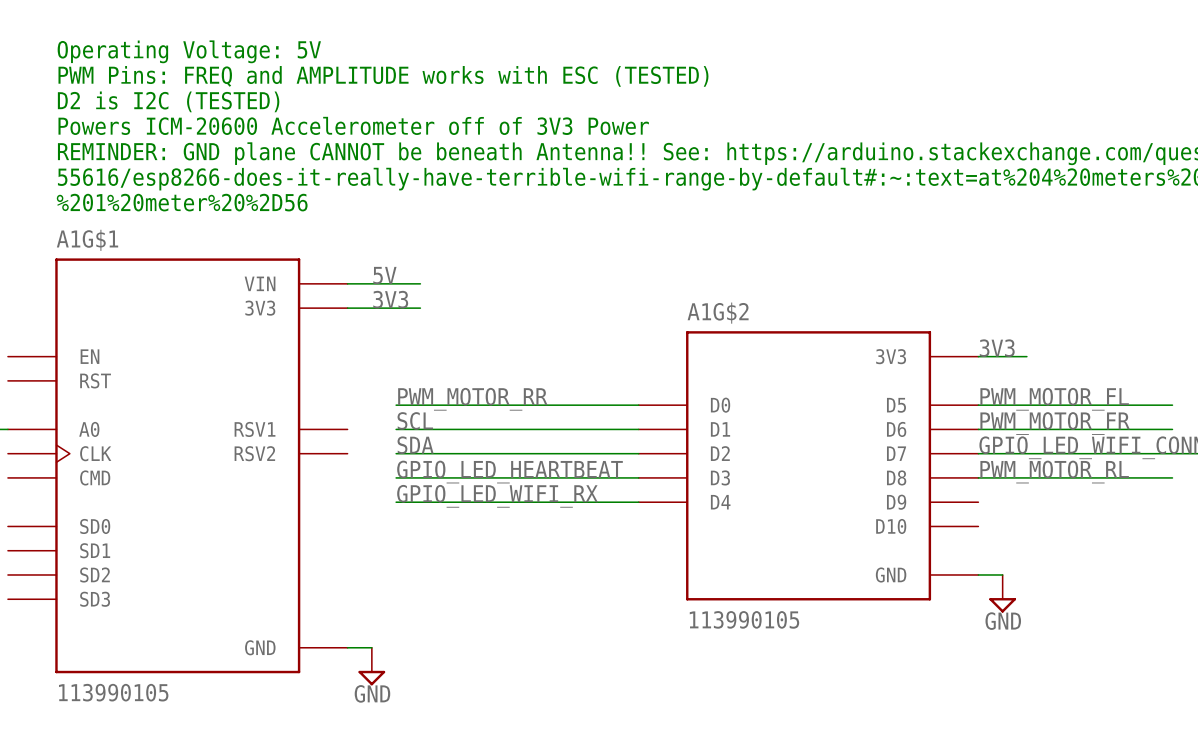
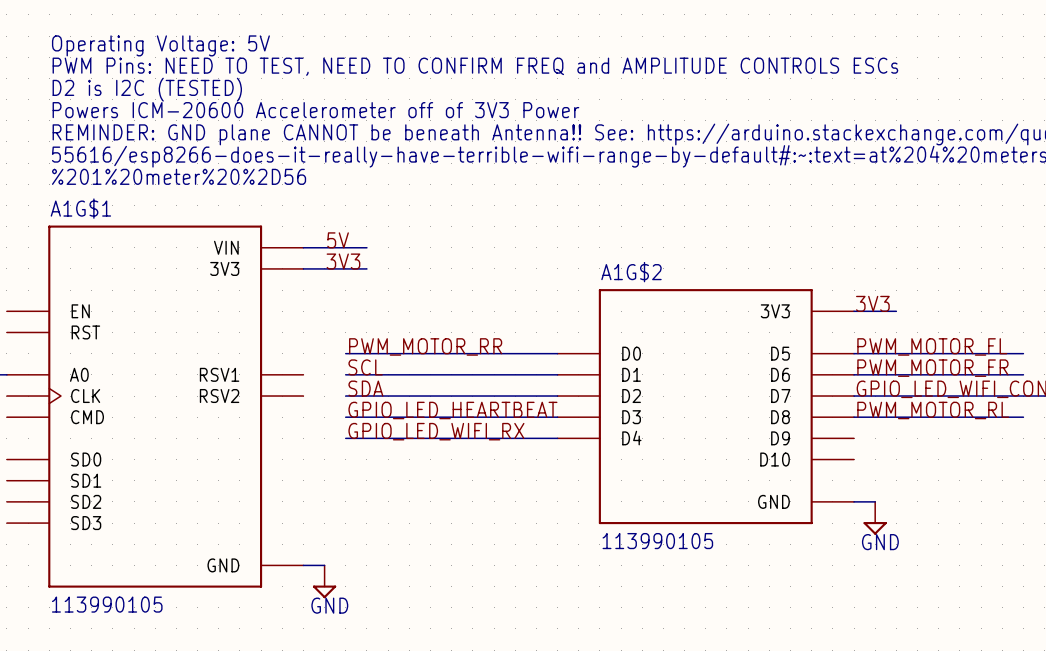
text: PWM Pins: FREQ and AMPLITUDE works with ESC (TESTED) (383, 76) -> PWM Pins: NEED TO TEST, NEED TO CONFIRM FREQ and AMPLITUDE CONTROLS ESCs (475, 66)

